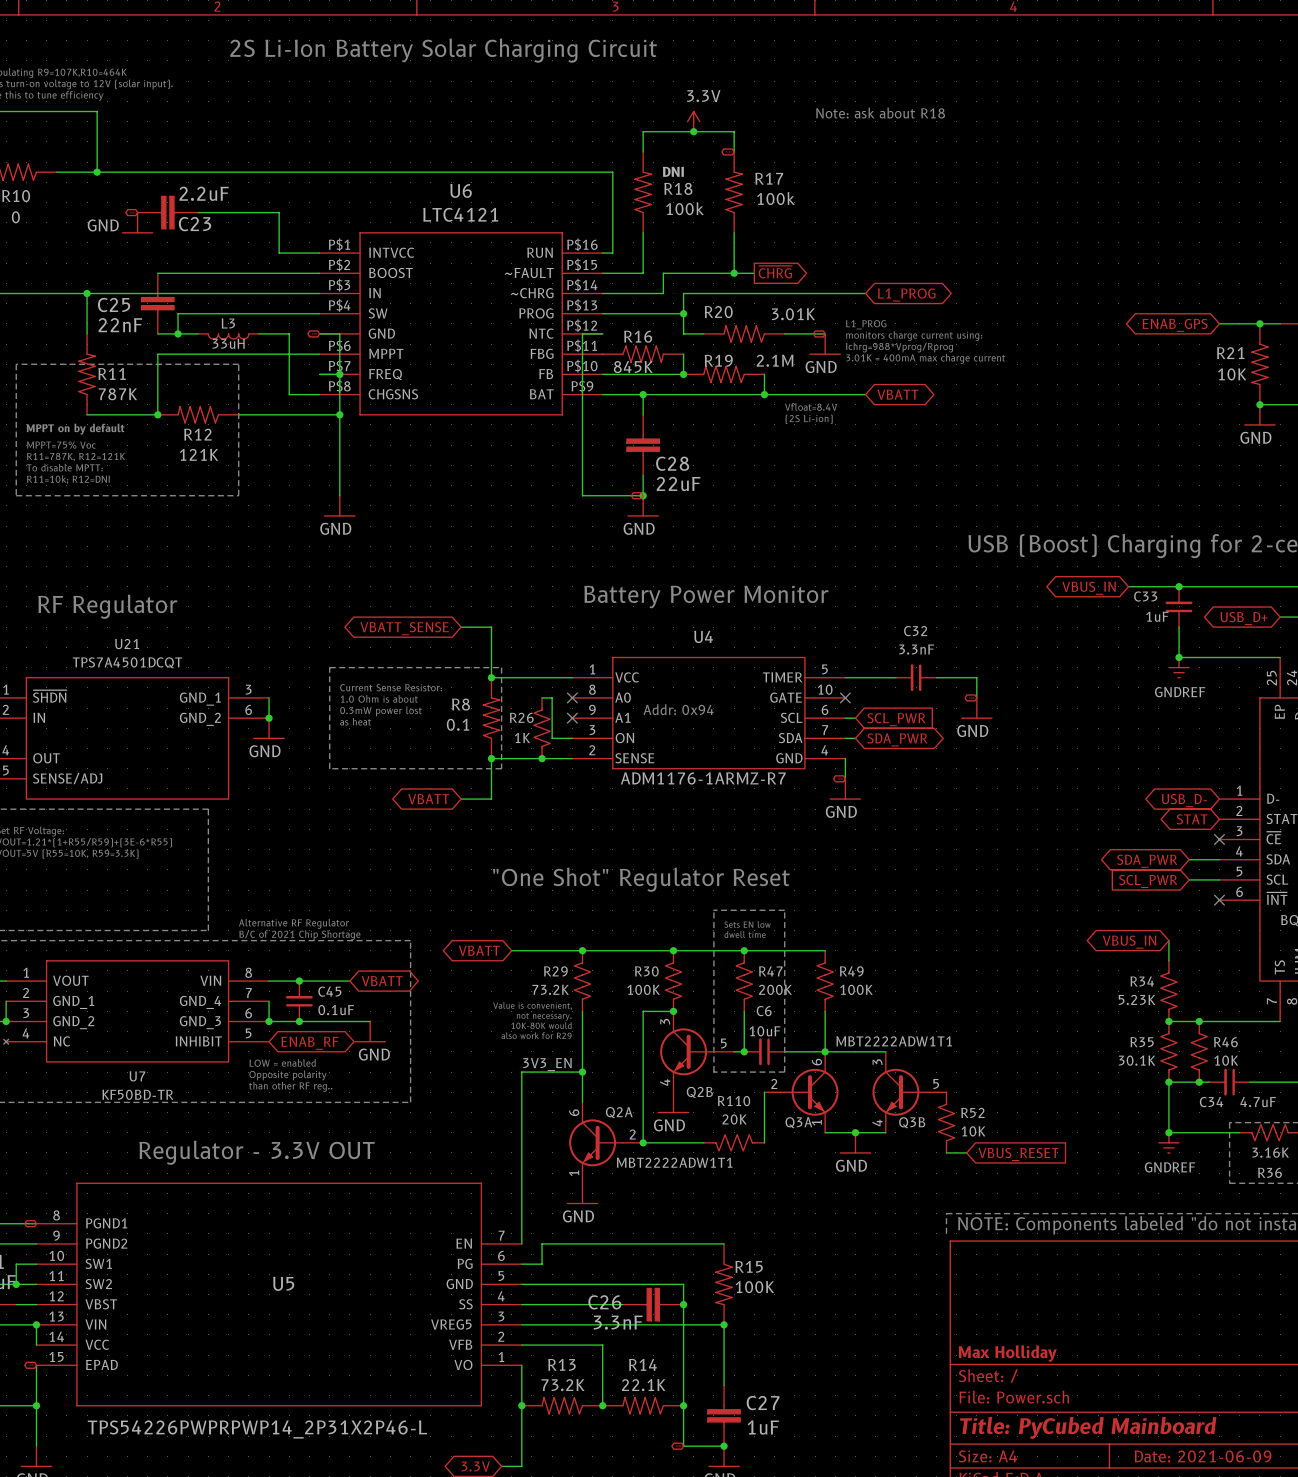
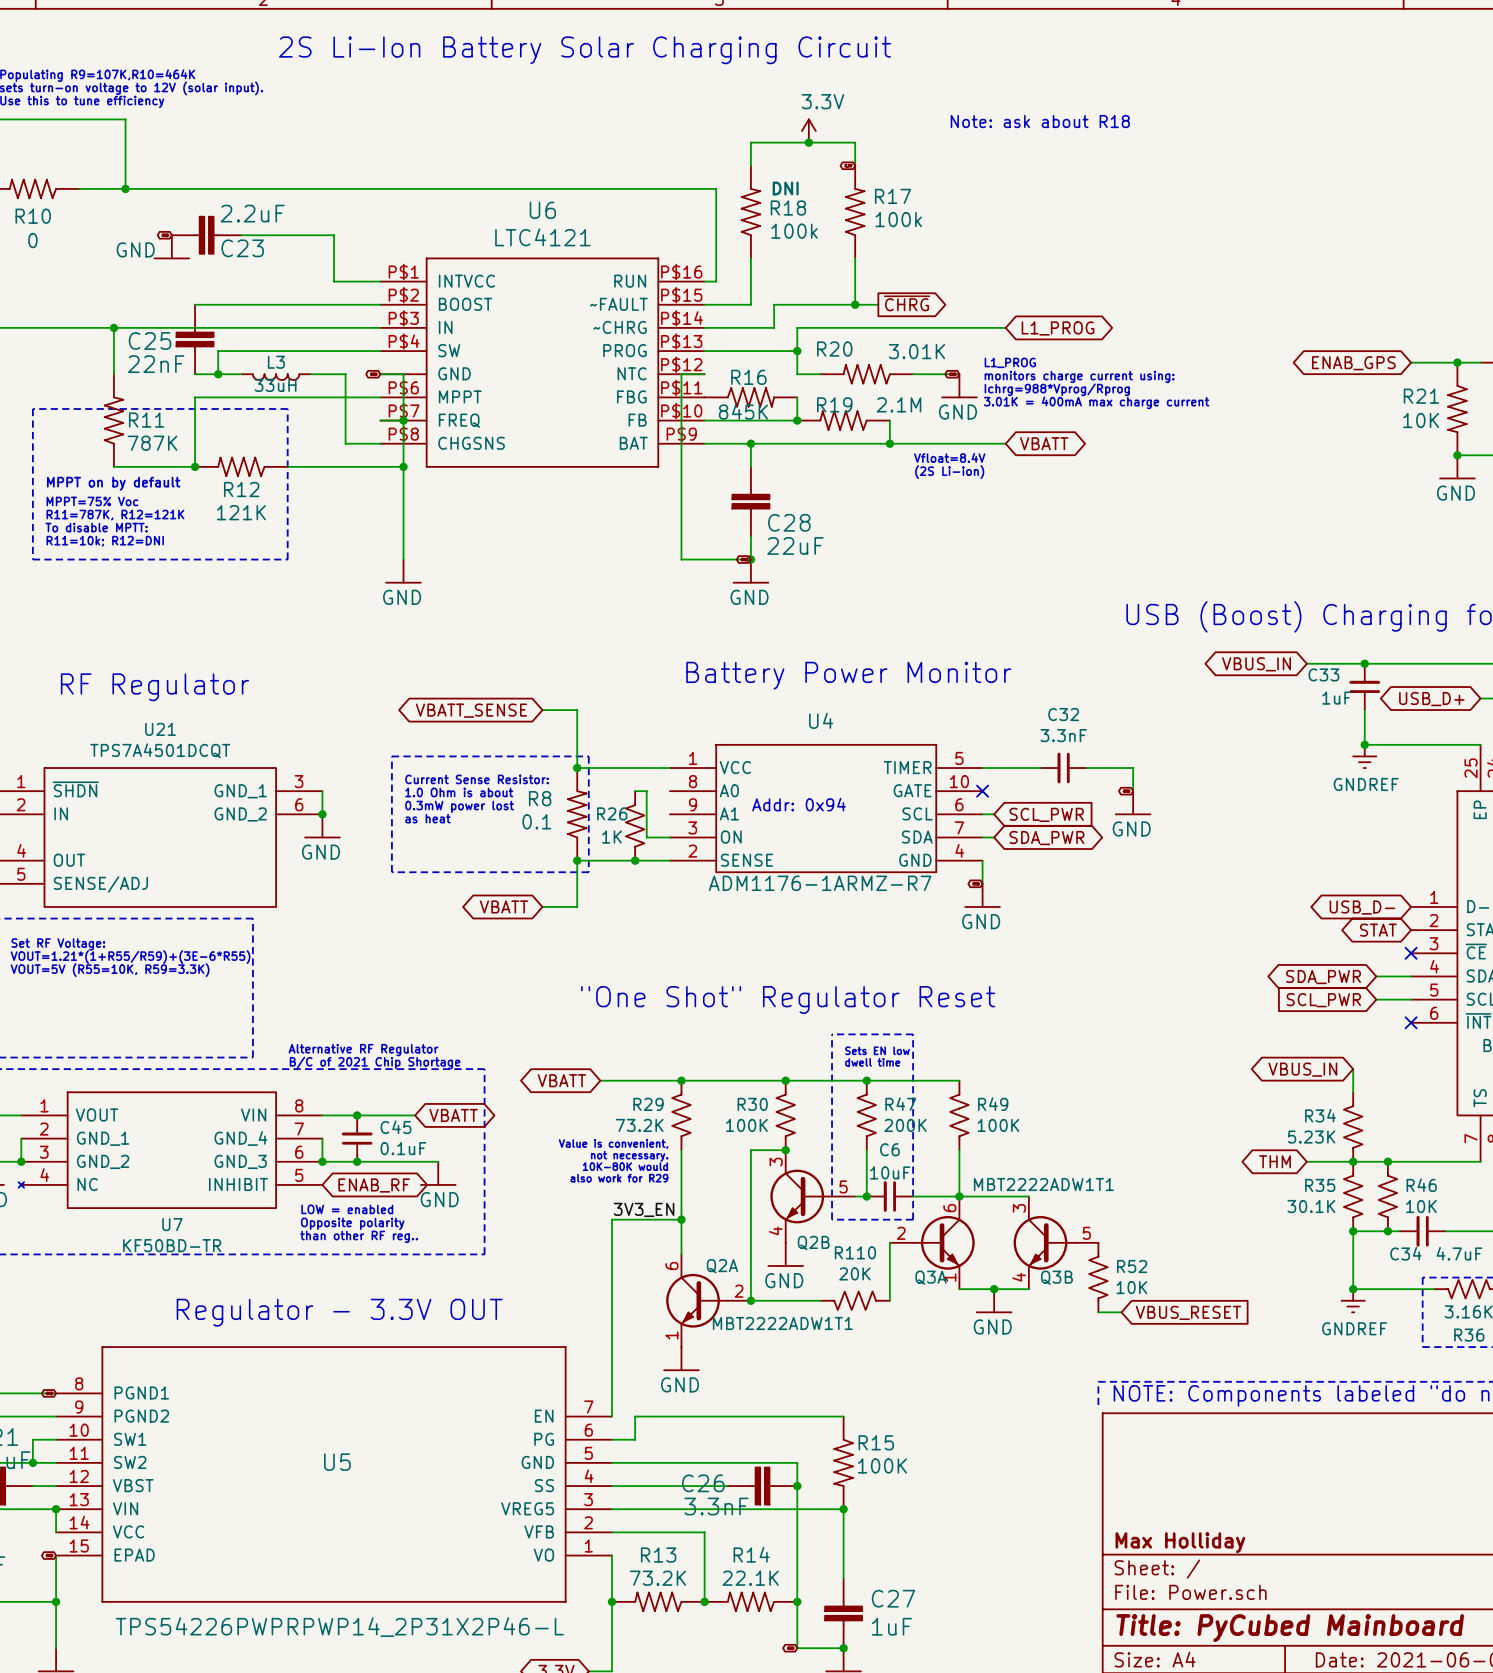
no-connect mark: (572, 697) -> none
no-connect mark: (572, 718) -> none
global label: none -> THM (1274, 1161)
wire: none -> (1306, 1161) (1353, 1161)

